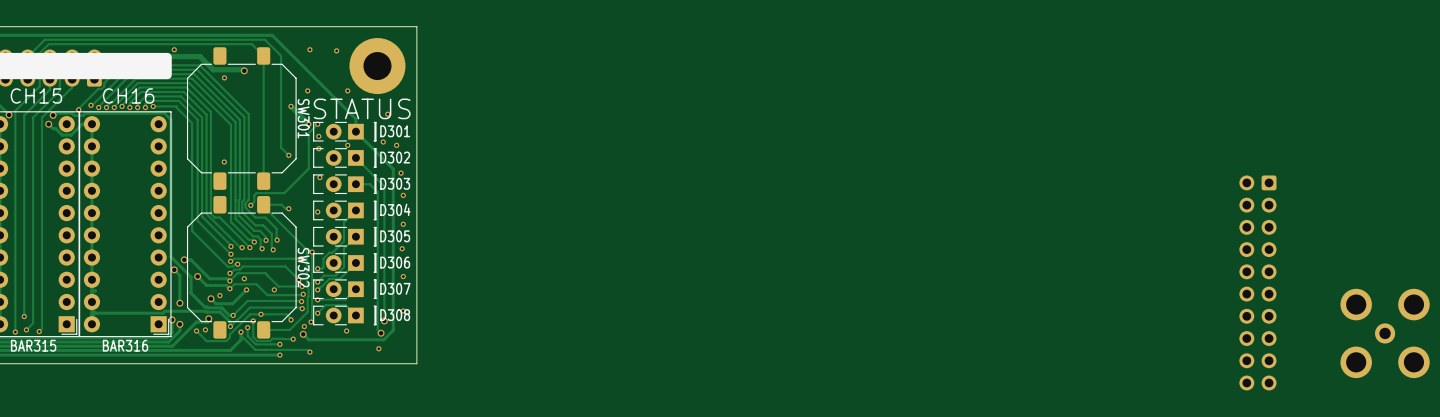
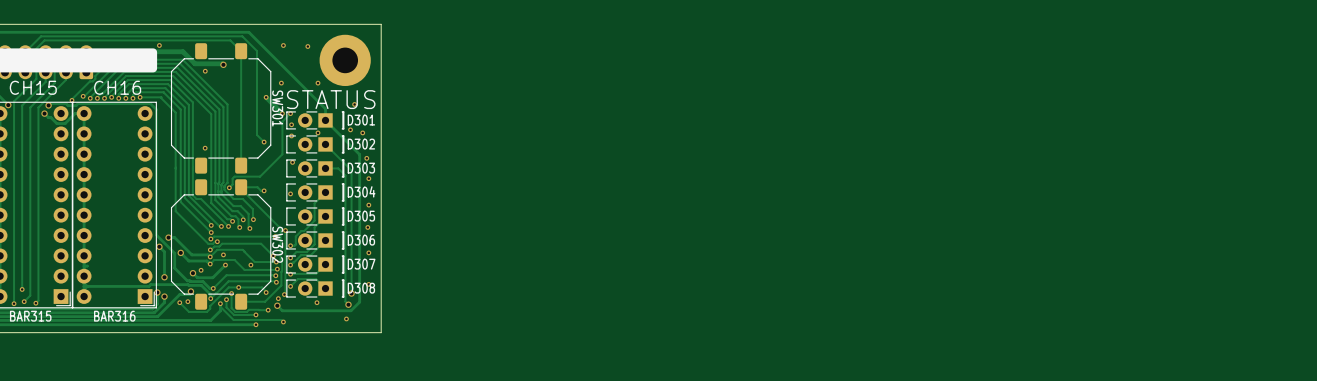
part: (1257, 282) -> none
part: (1385, 333) -> none

